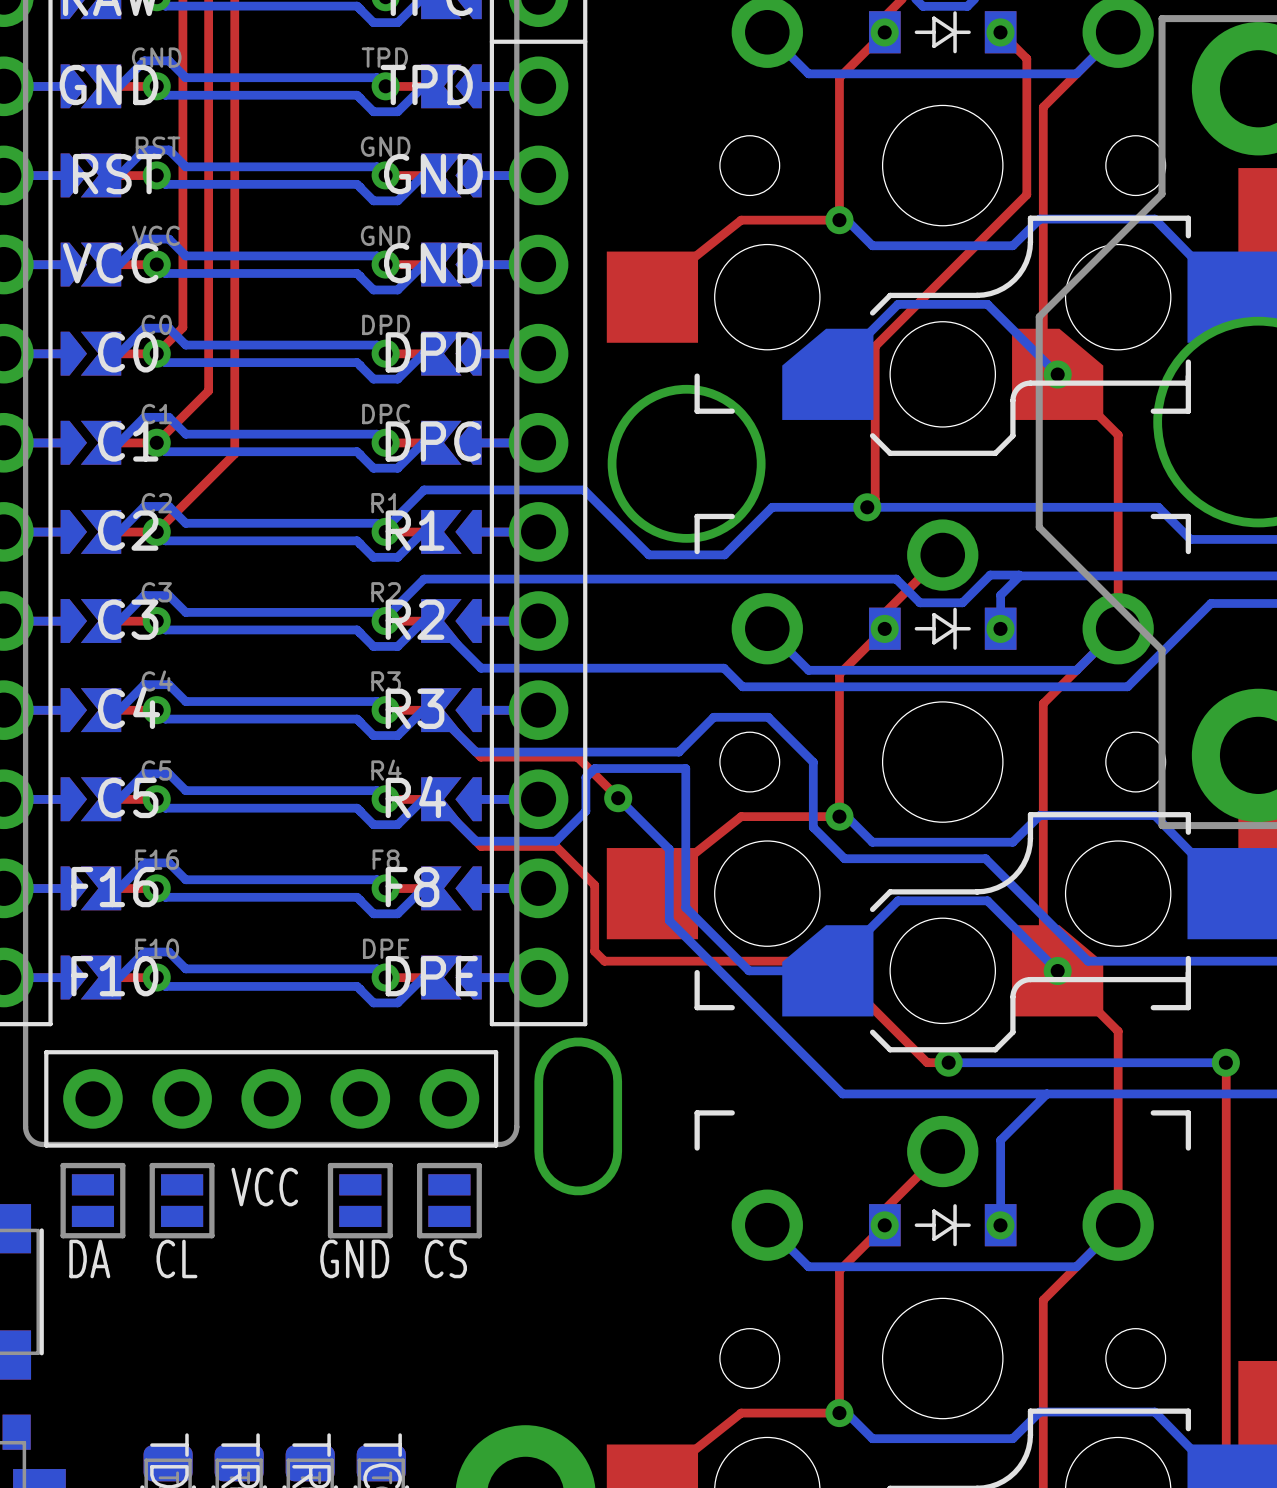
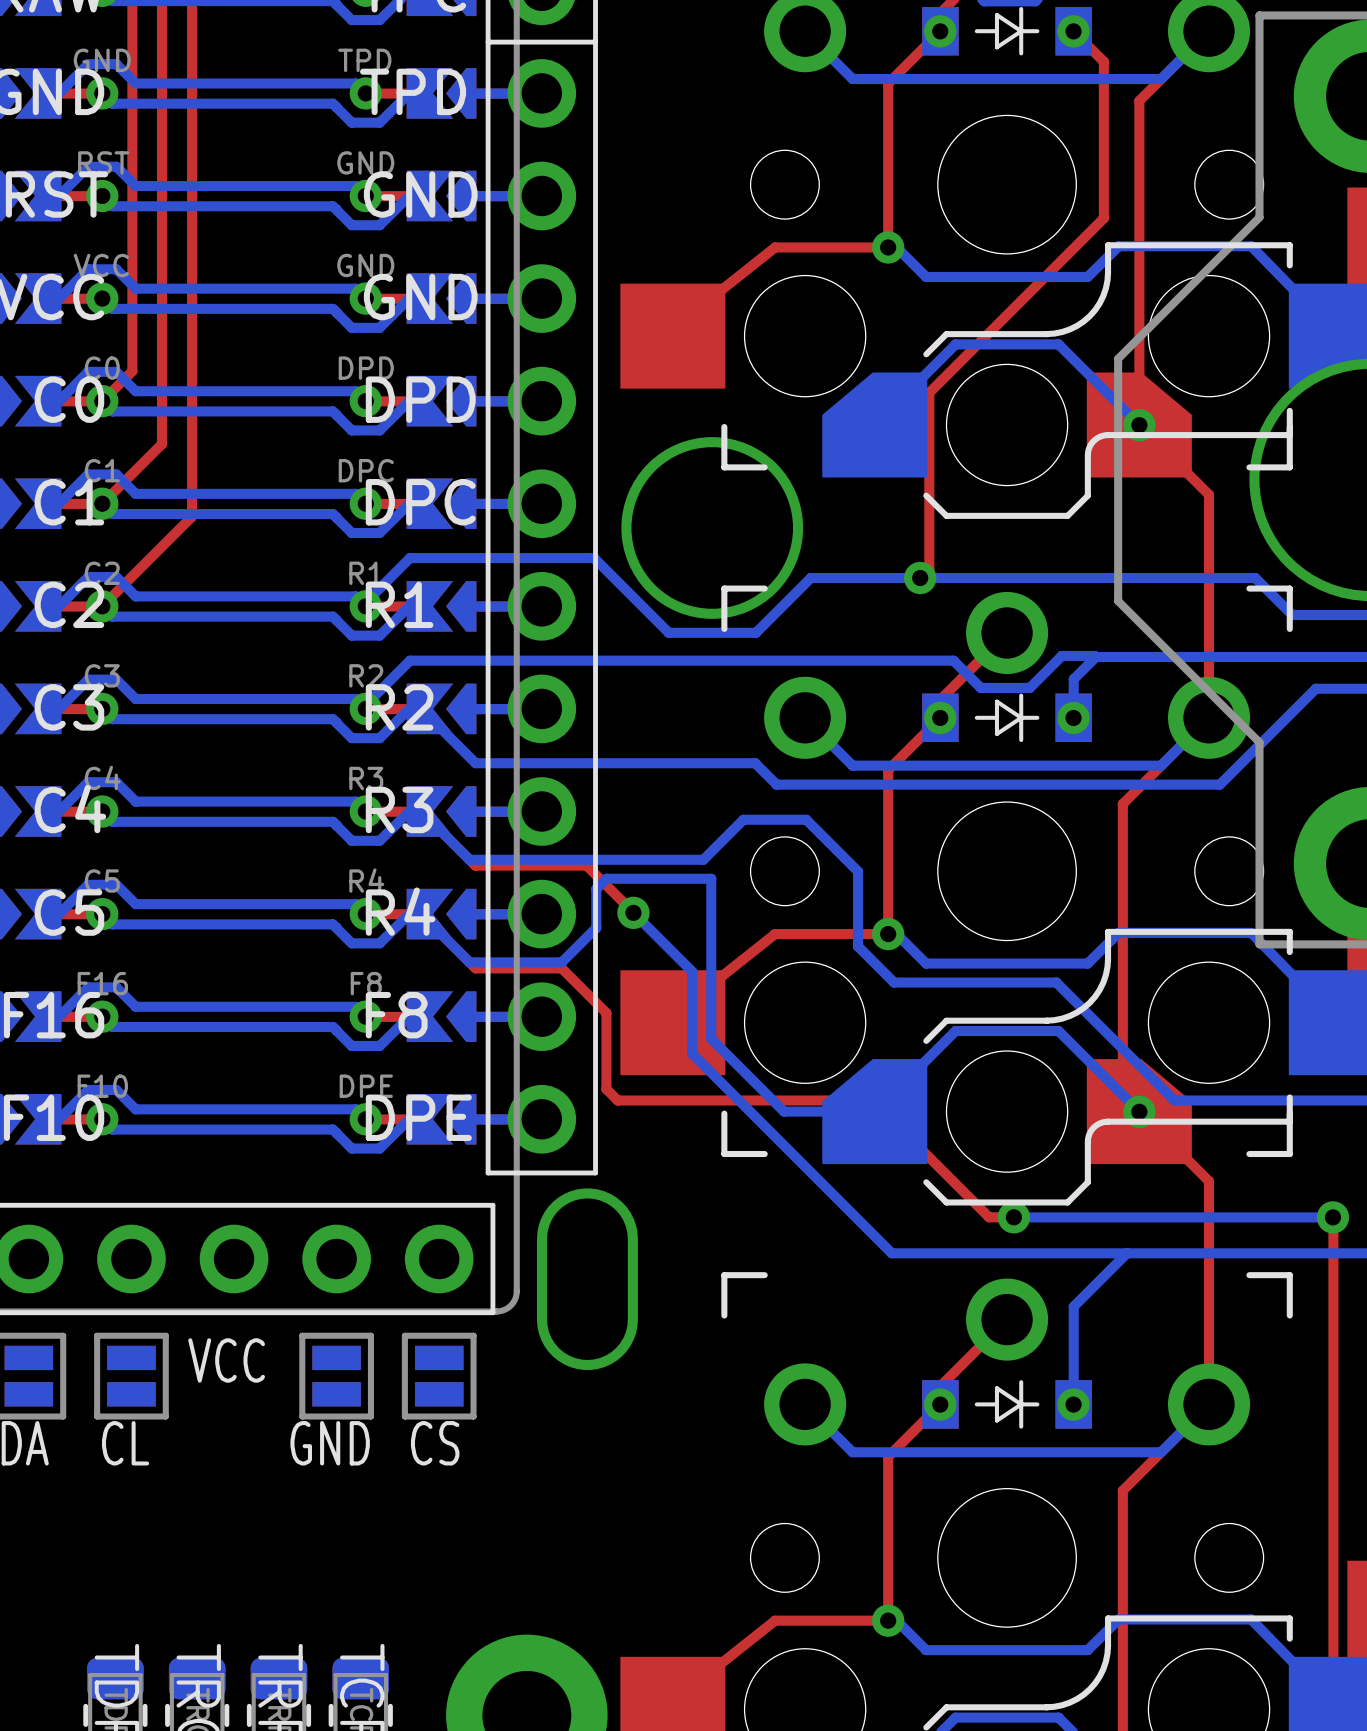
top track: (1057, 92) (1043, 107) (1043, 360) (1057, 374) -> (1139, 100) (1139, 425)

